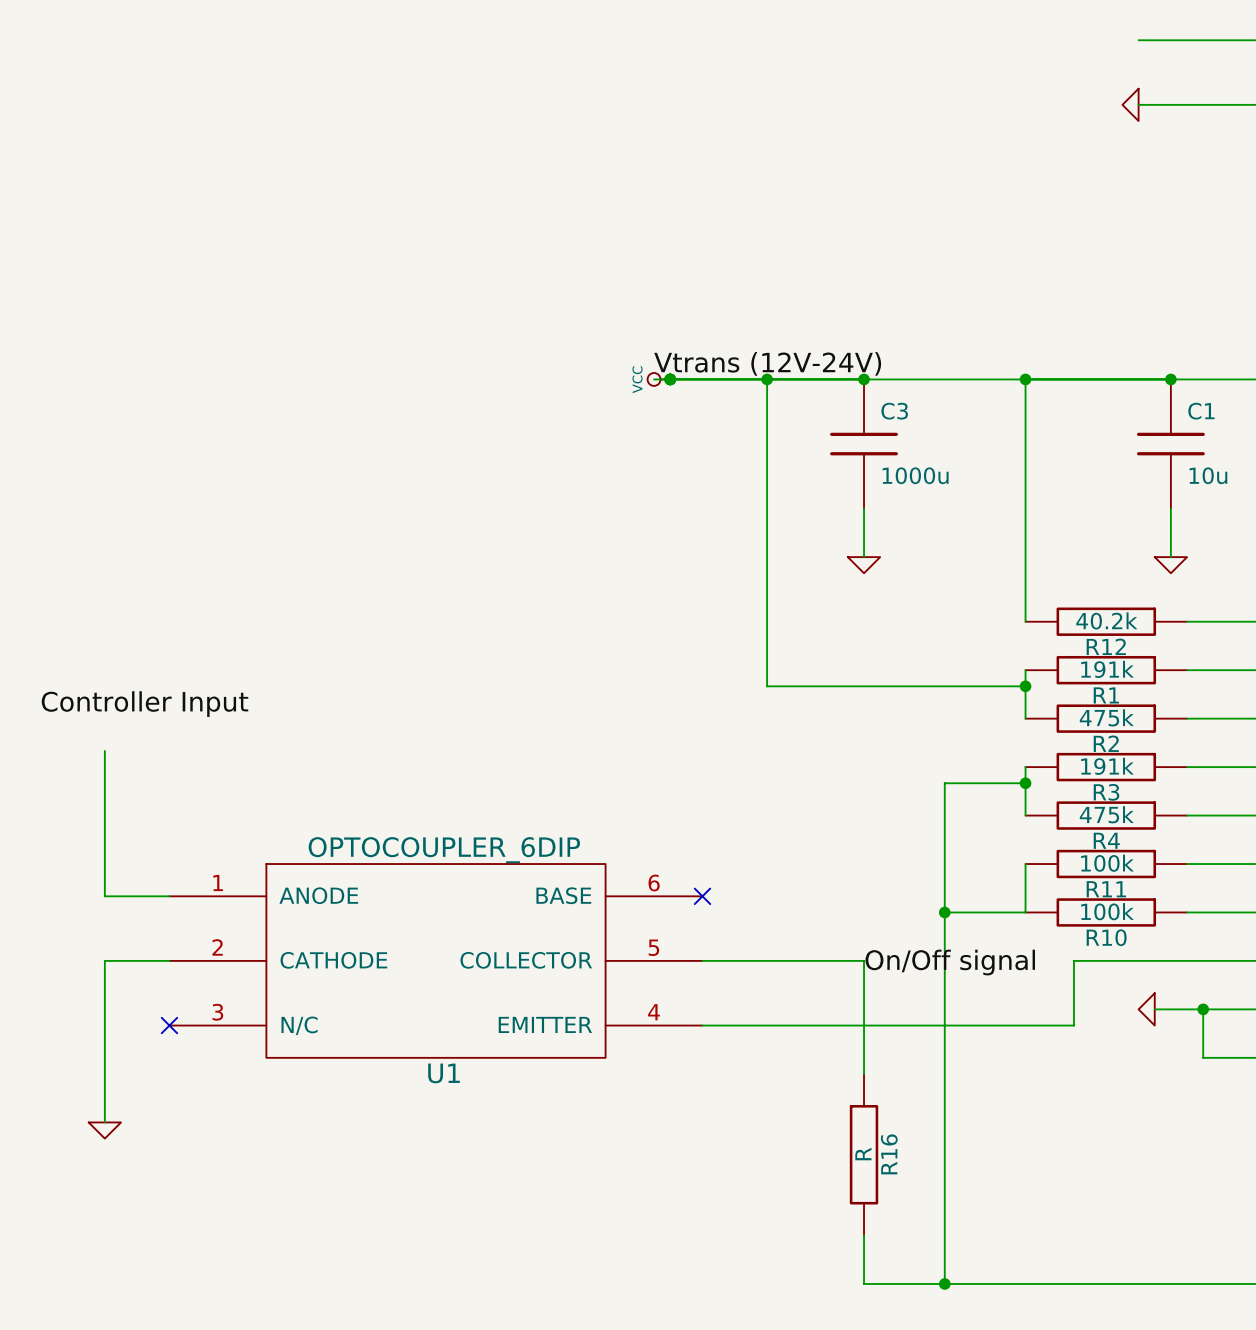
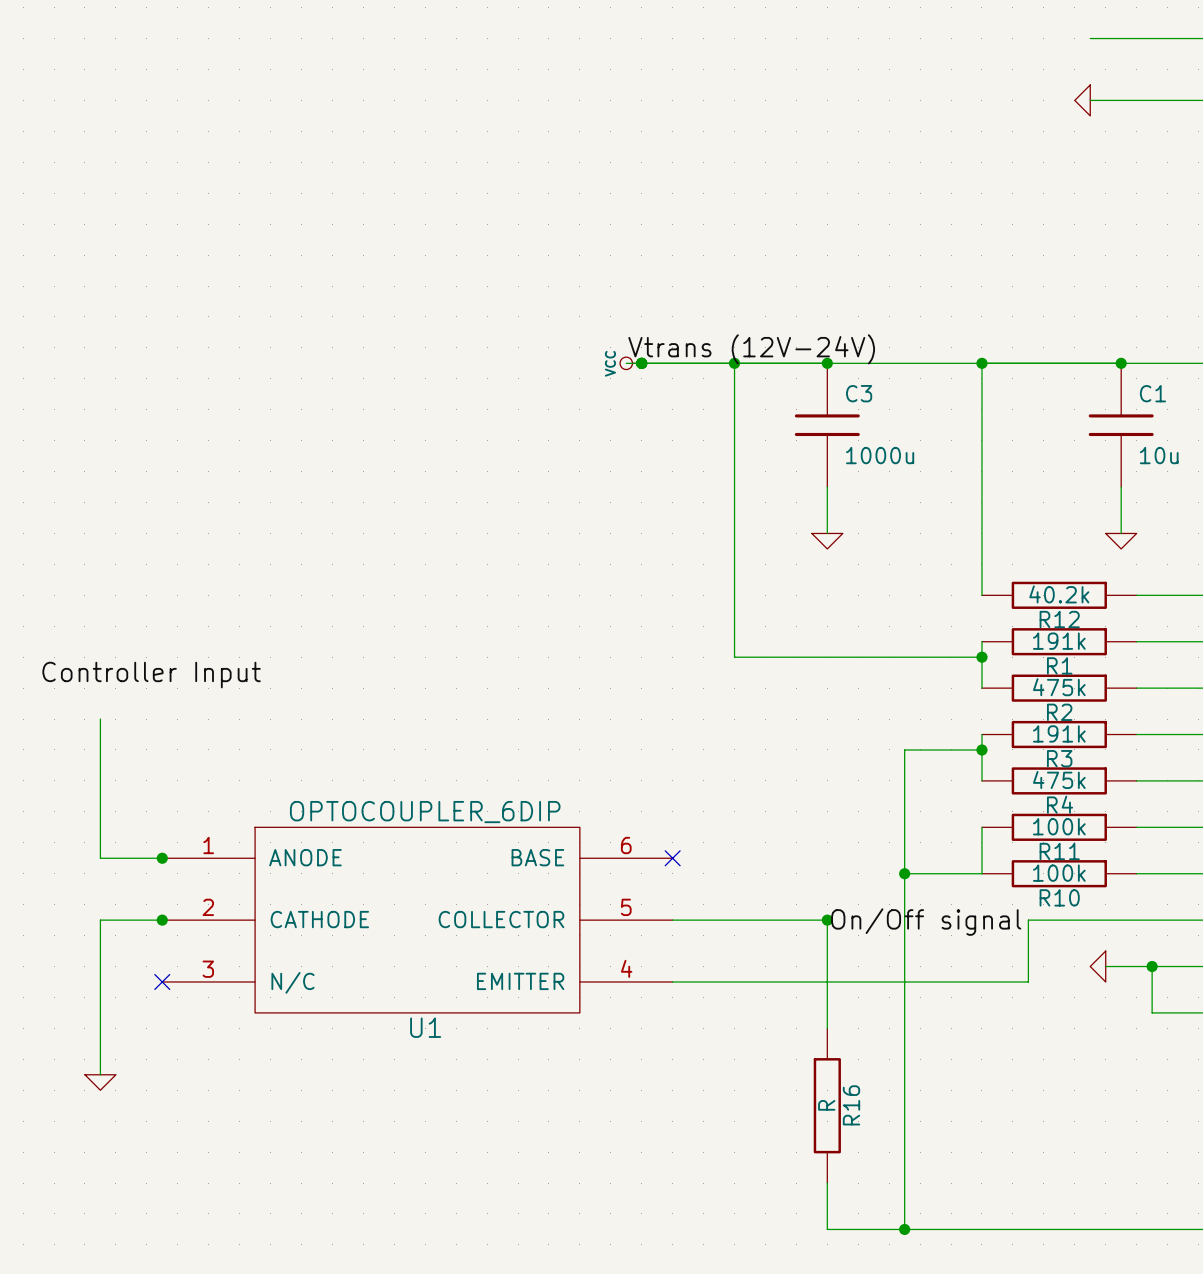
junction: none -> (162, 858)
junction: none -> (162, 920)
junction: none -> (827, 920)

